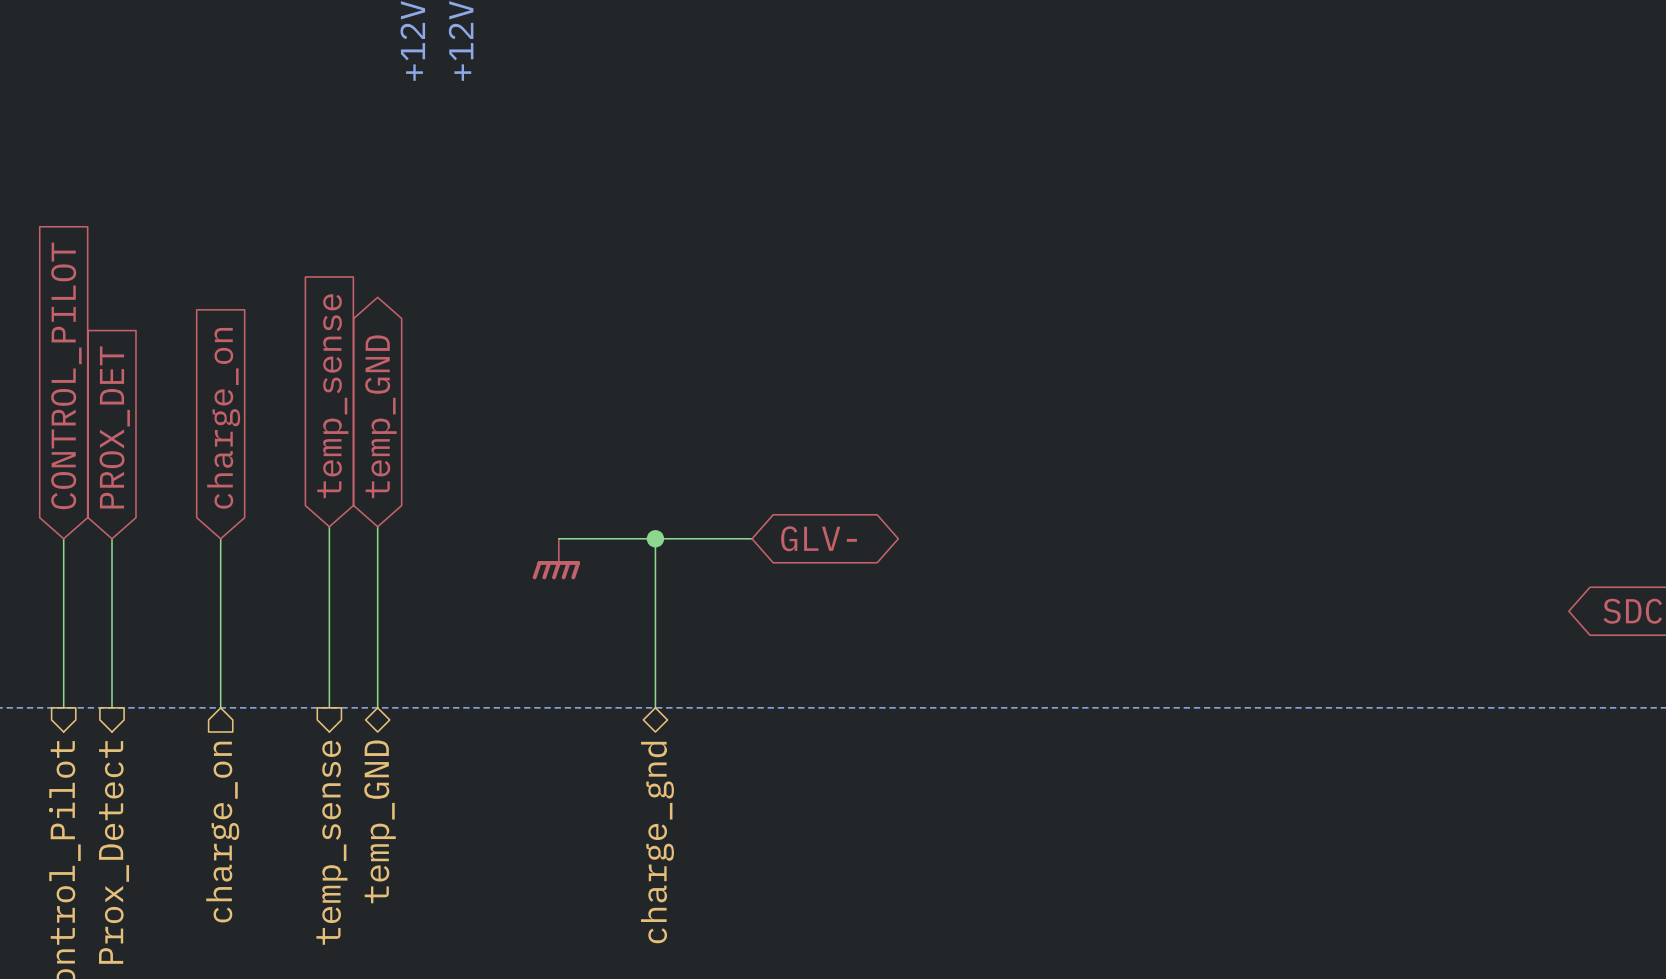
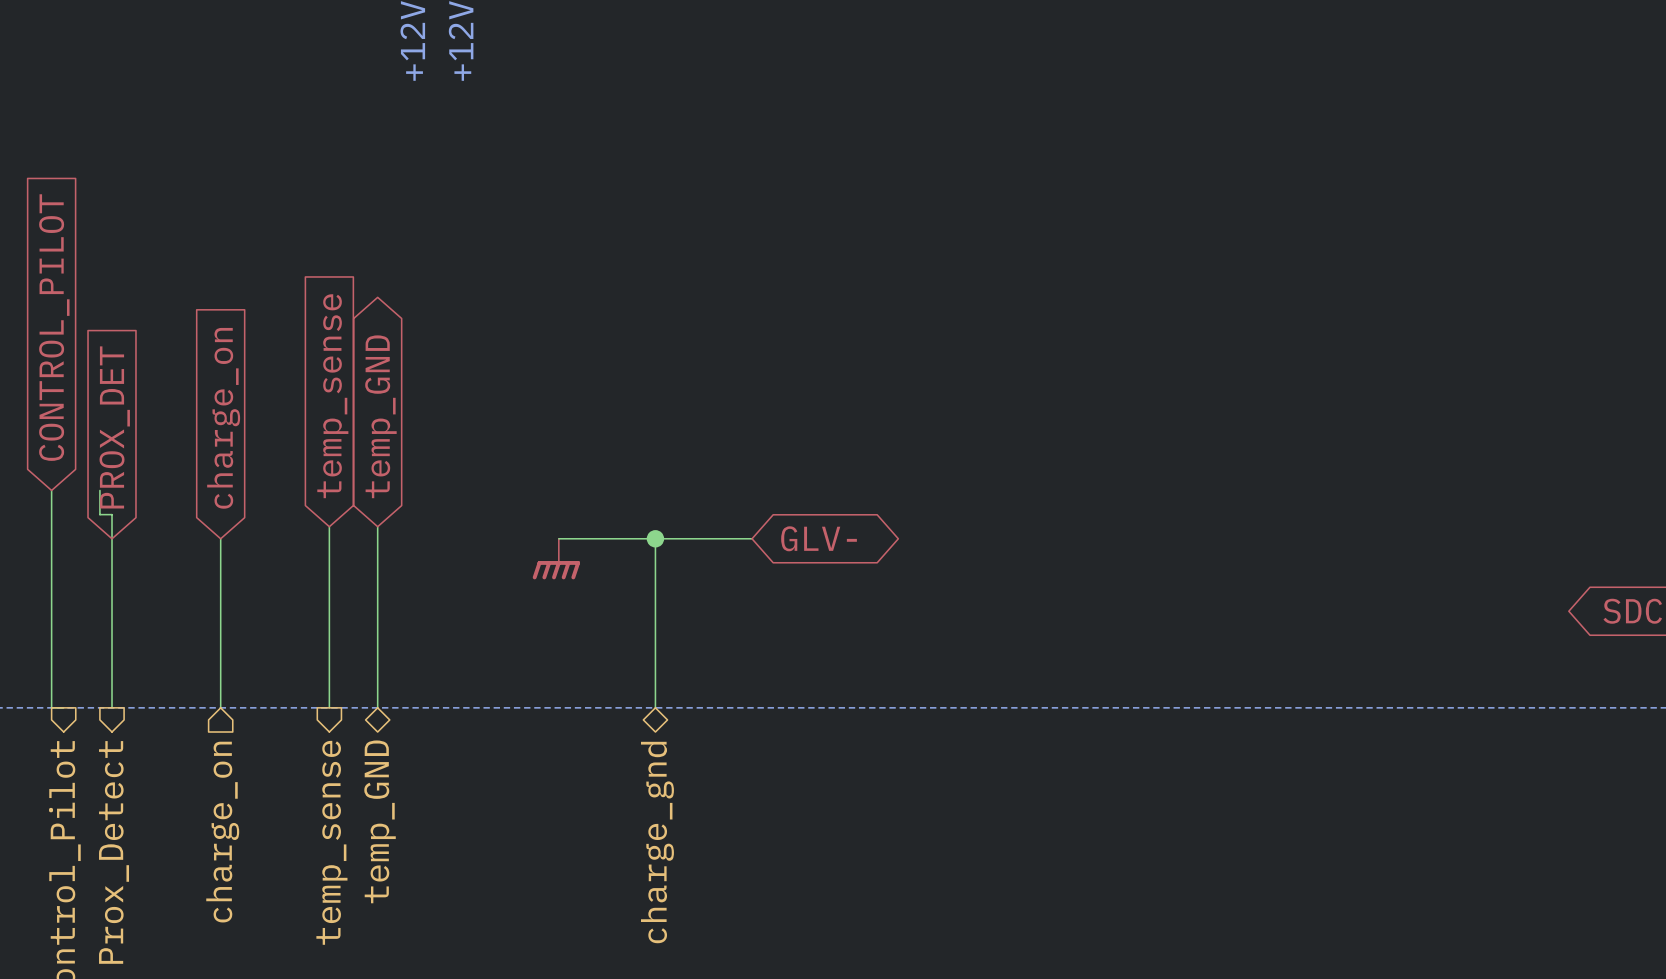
global label position: CONTROL_PILOT (66, 375) -> CONTROL_PILOT (54, 327)
wire: none -> (99, 490) (99, 514) (112, 514) (112, 538)
wire: (63, 538) (63, 707) -> (51, 490) (51, 707) (63, 707)

